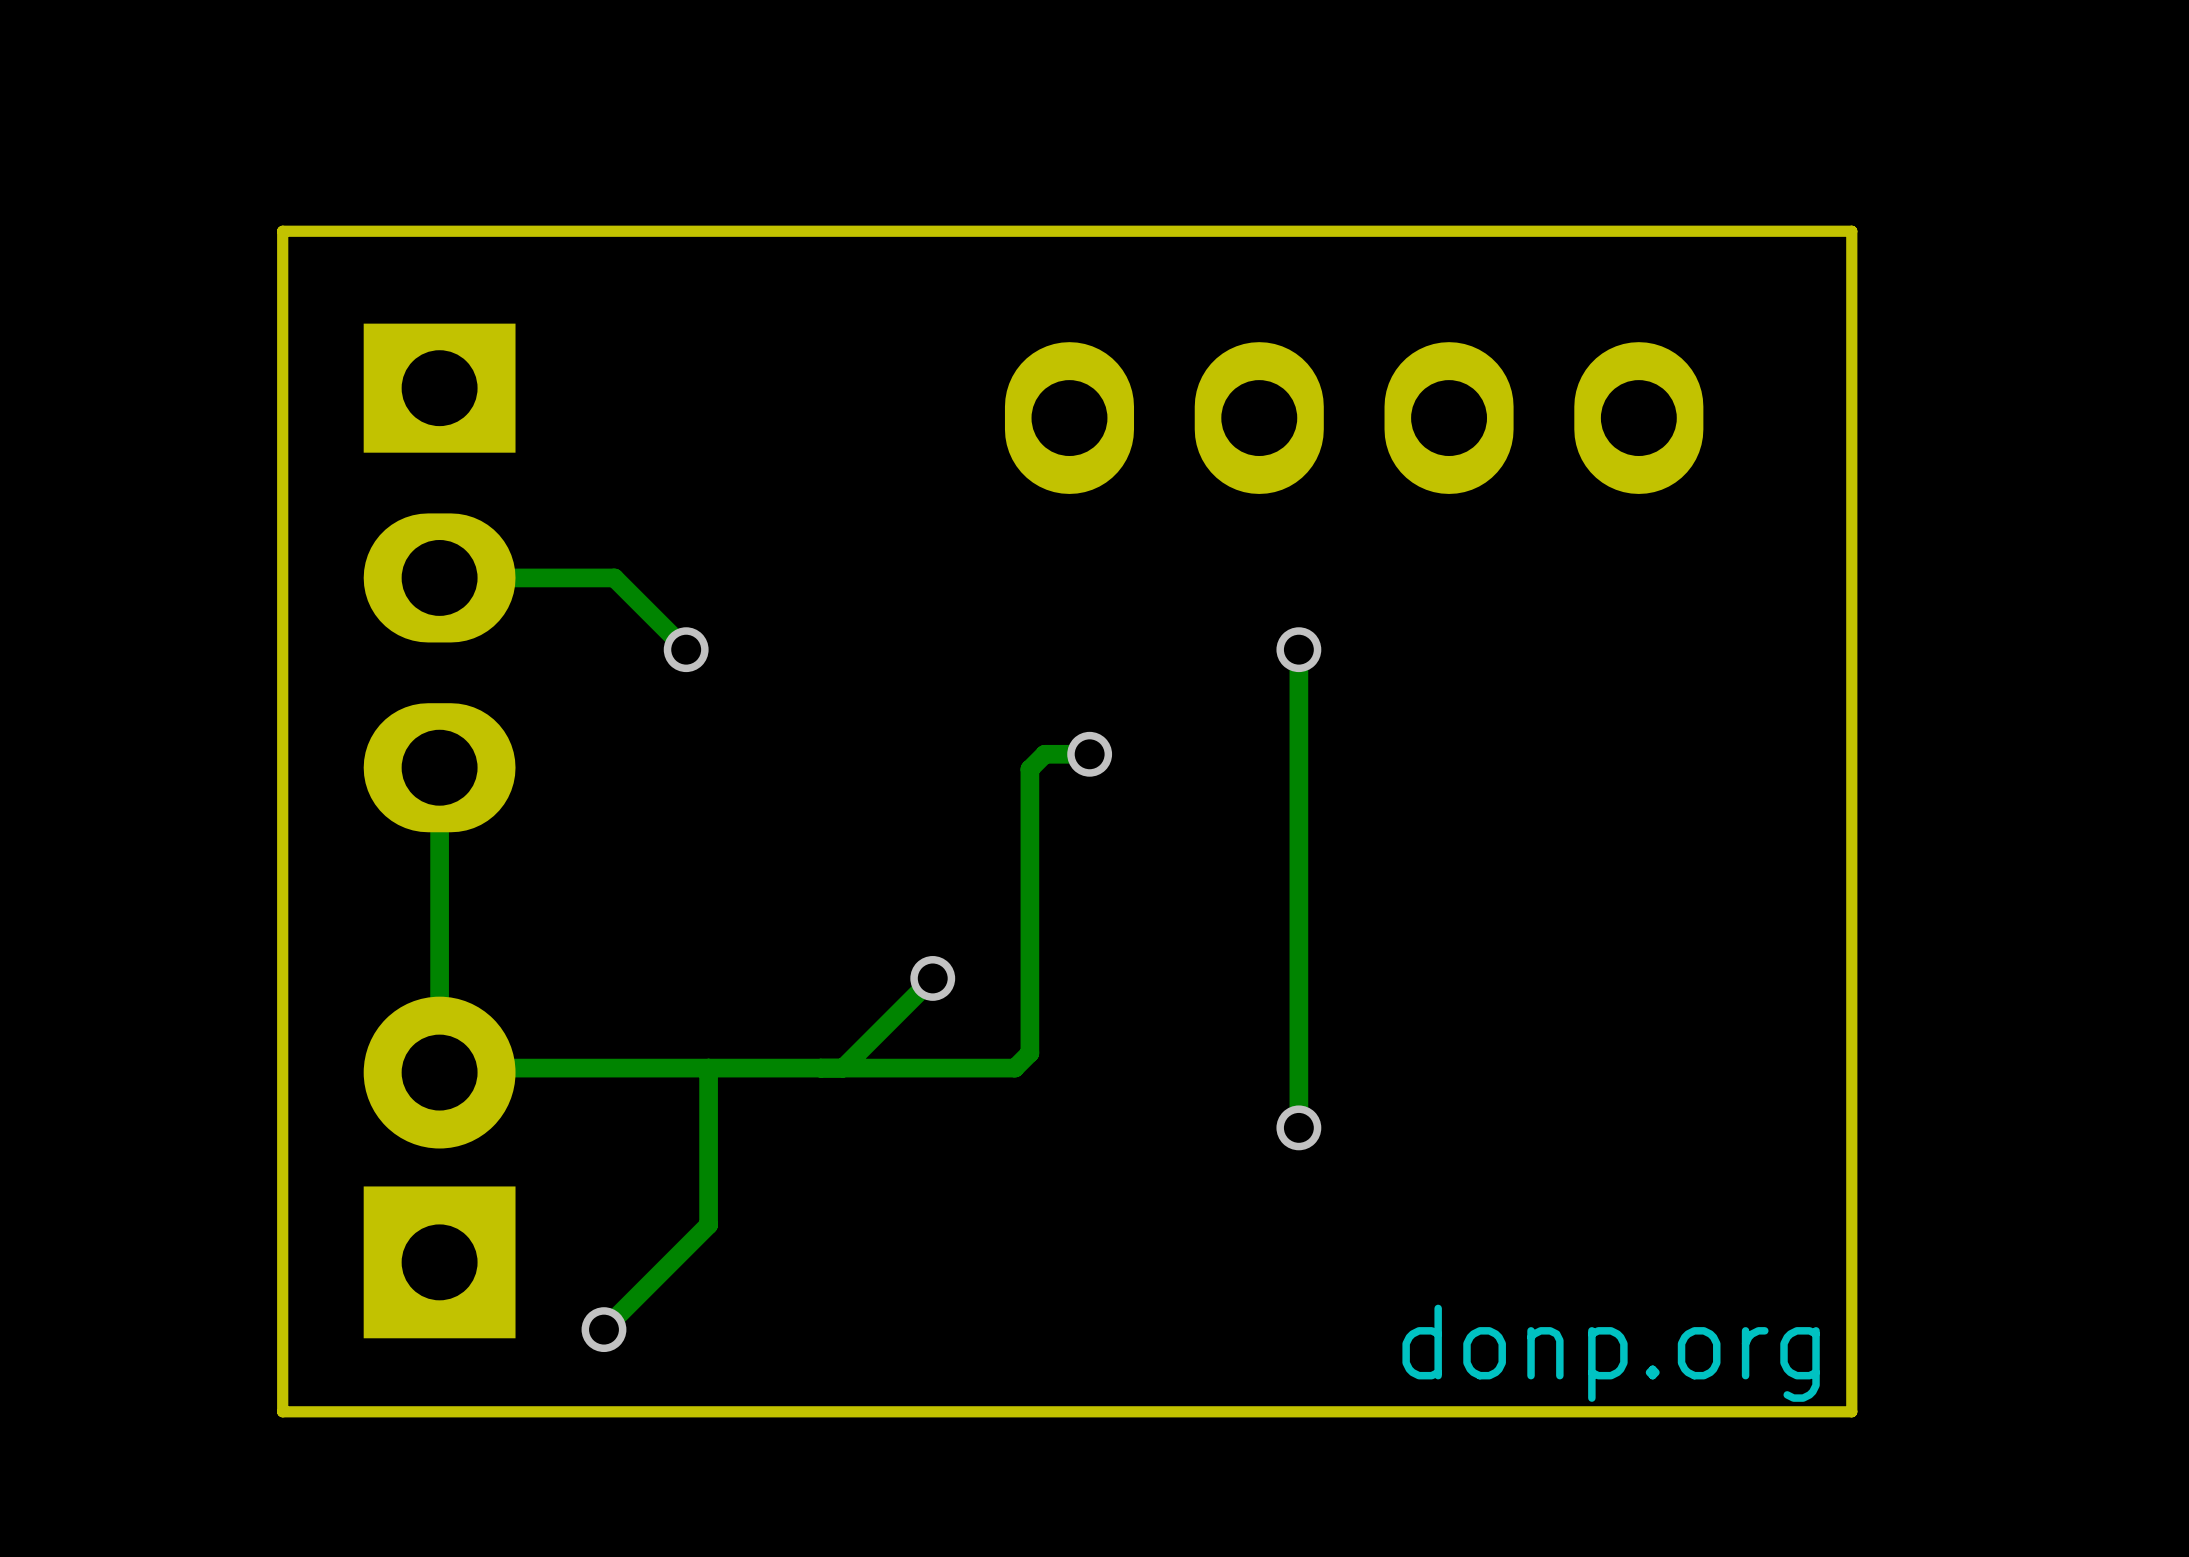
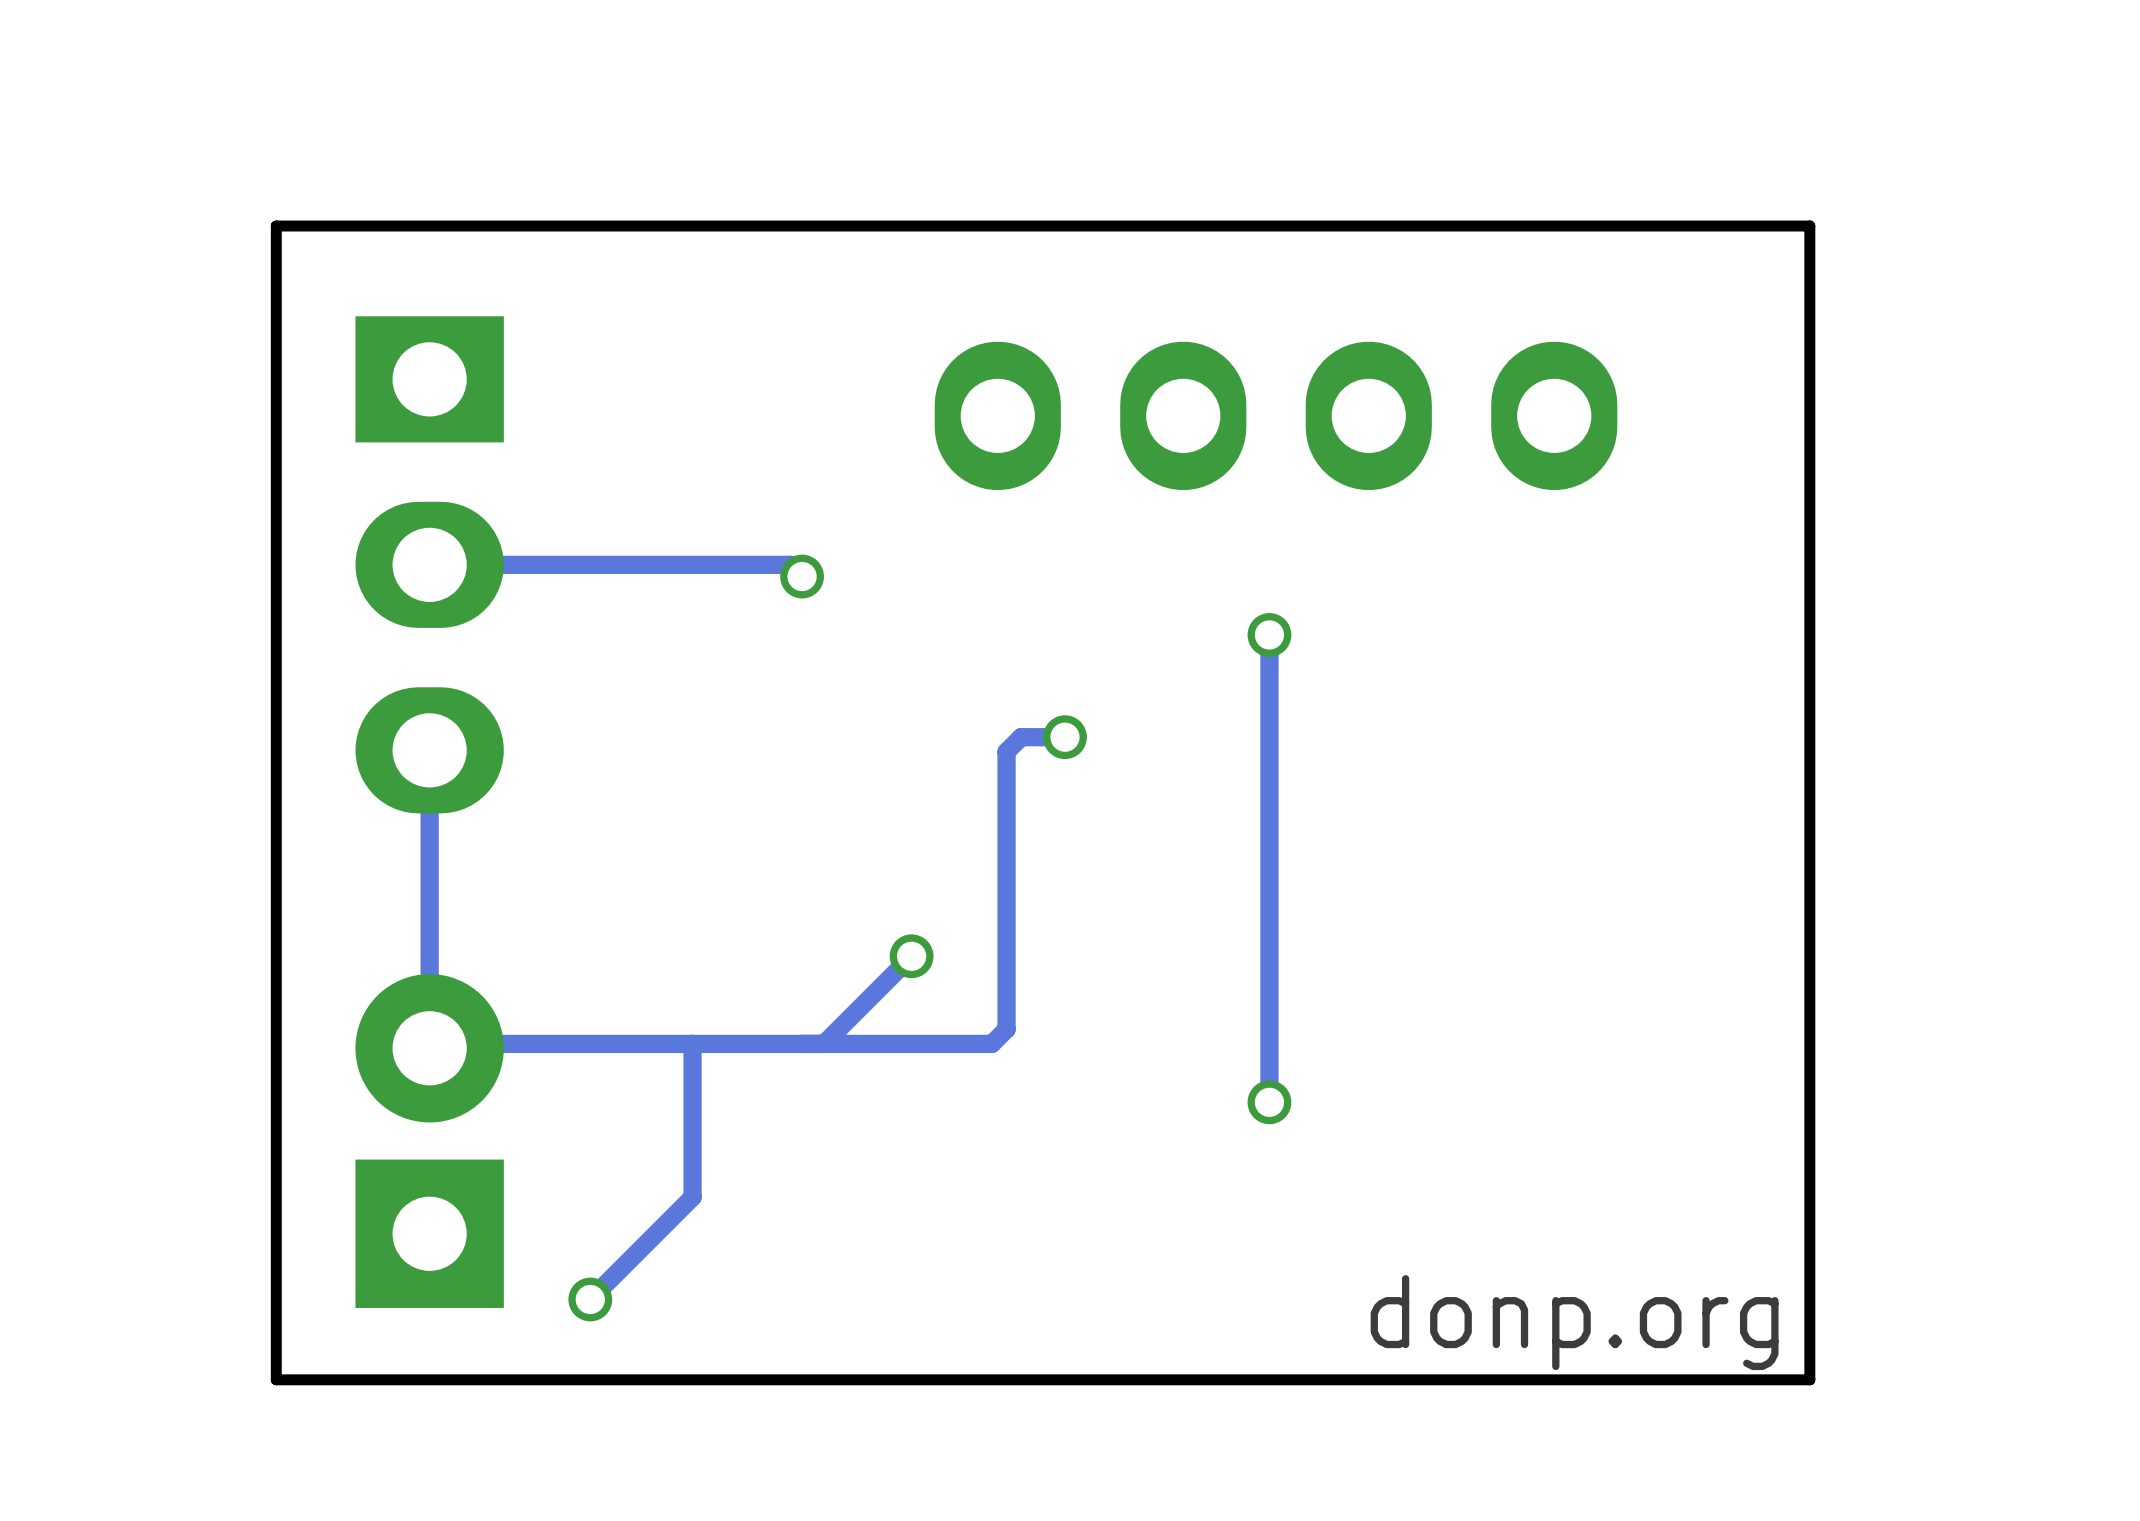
part position: (1354, 418) -> (1276, 415)
track: (614, 577) (686, 649) -> (600, 564) (790, 564) (802, 576)
via position: (686, 649) -> (802, 576)

